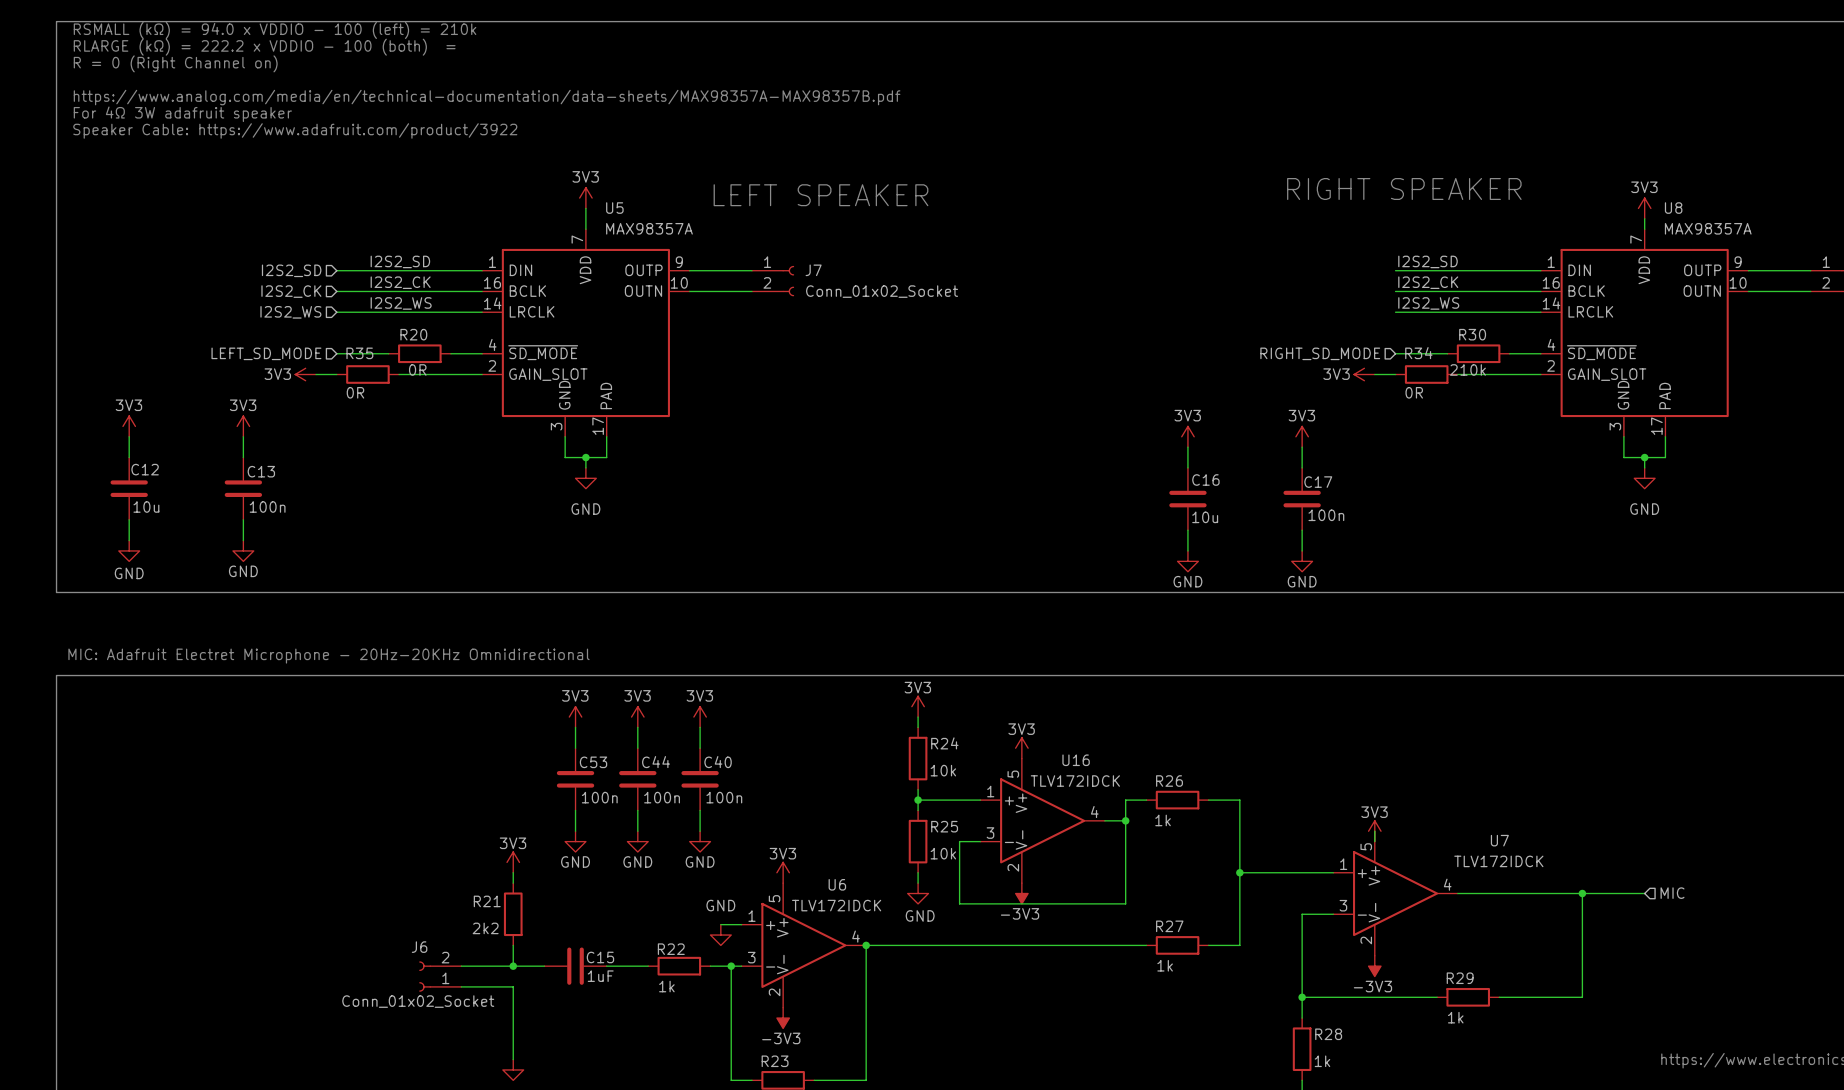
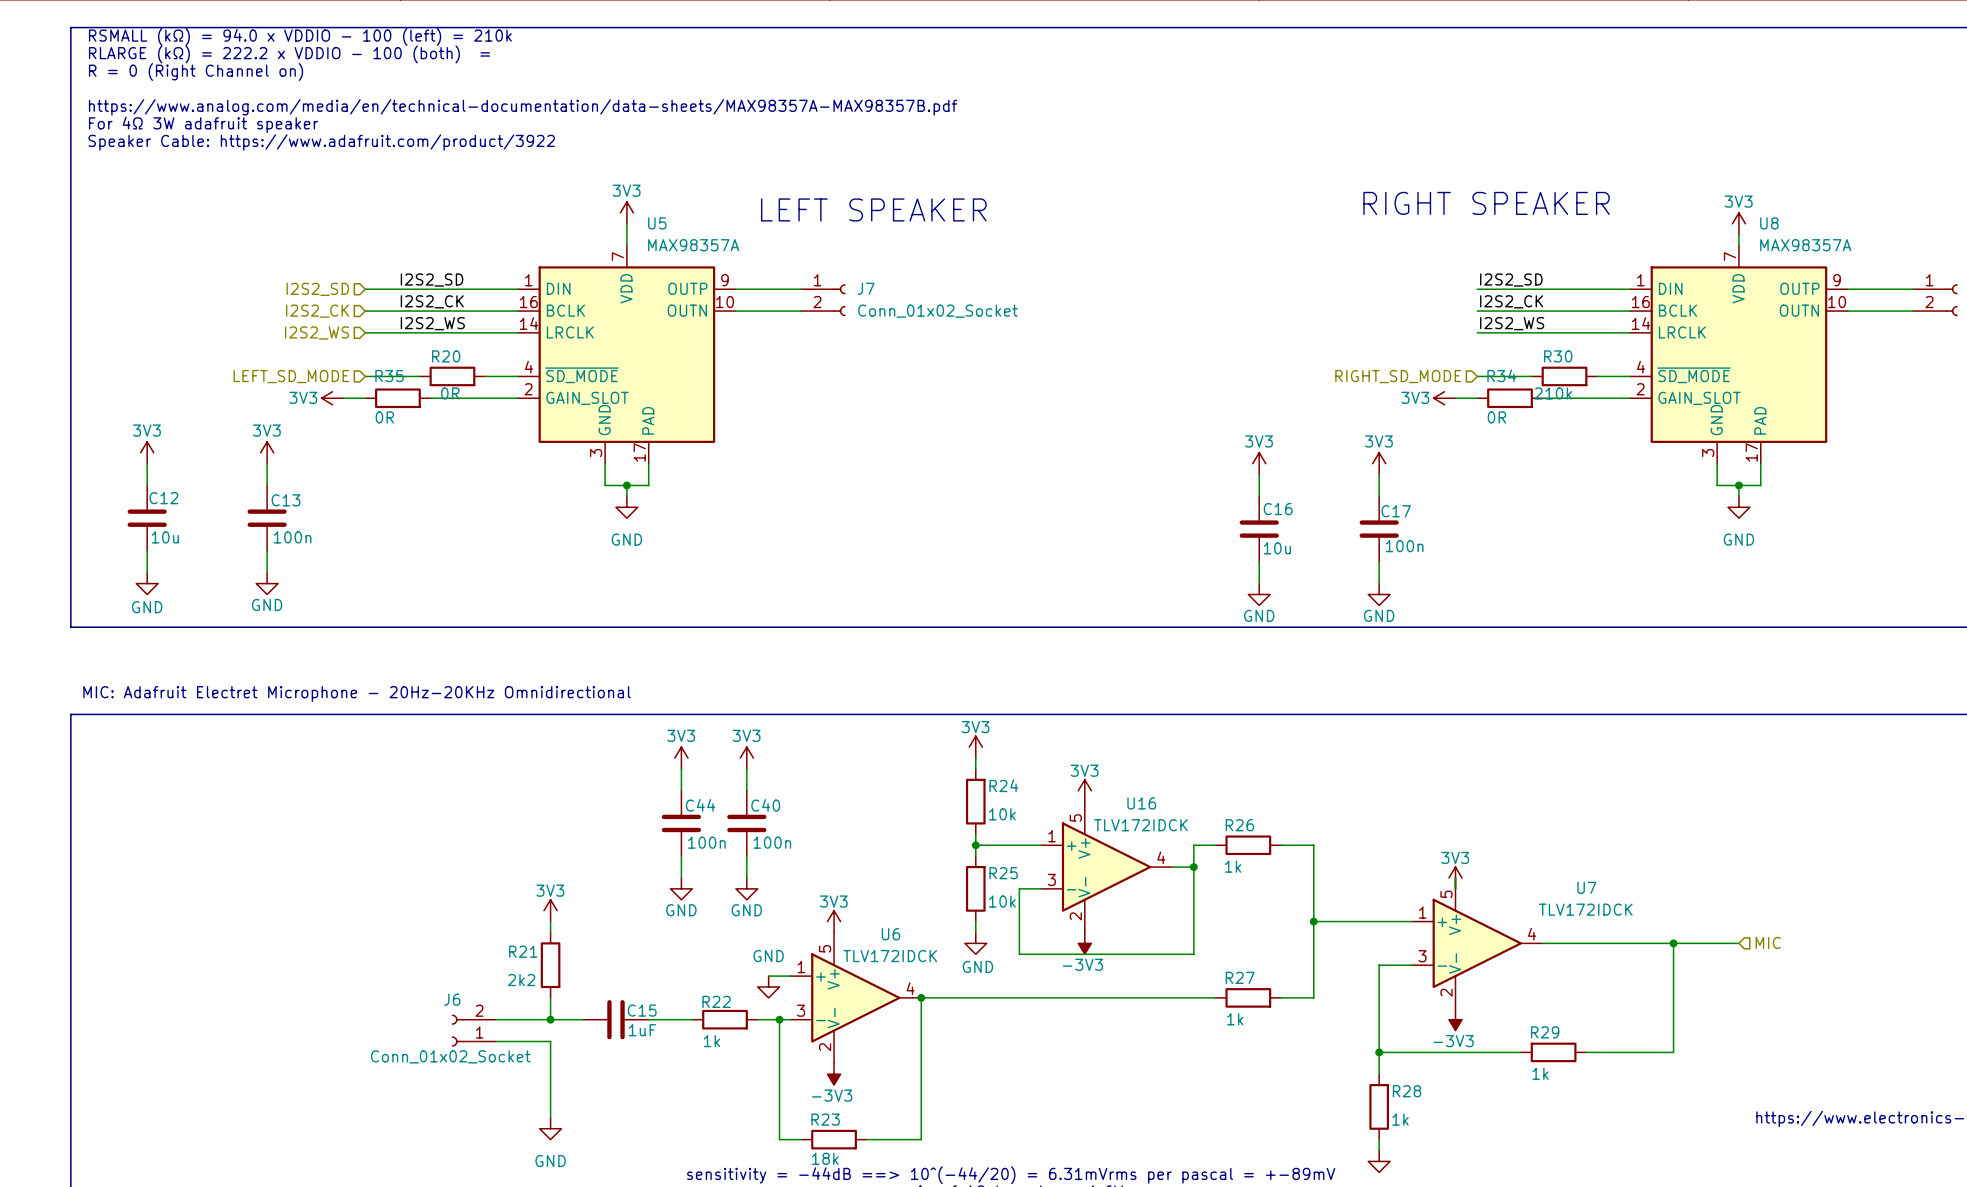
power symbol: 3V3 (575, 717) -> none
wire: (575, 727) (575, 748) -> none
C53: 100n (575, 779) -> none
wire: (575, 810) (575, 831) -> none
power symbol: GND (575, 841) -> none

